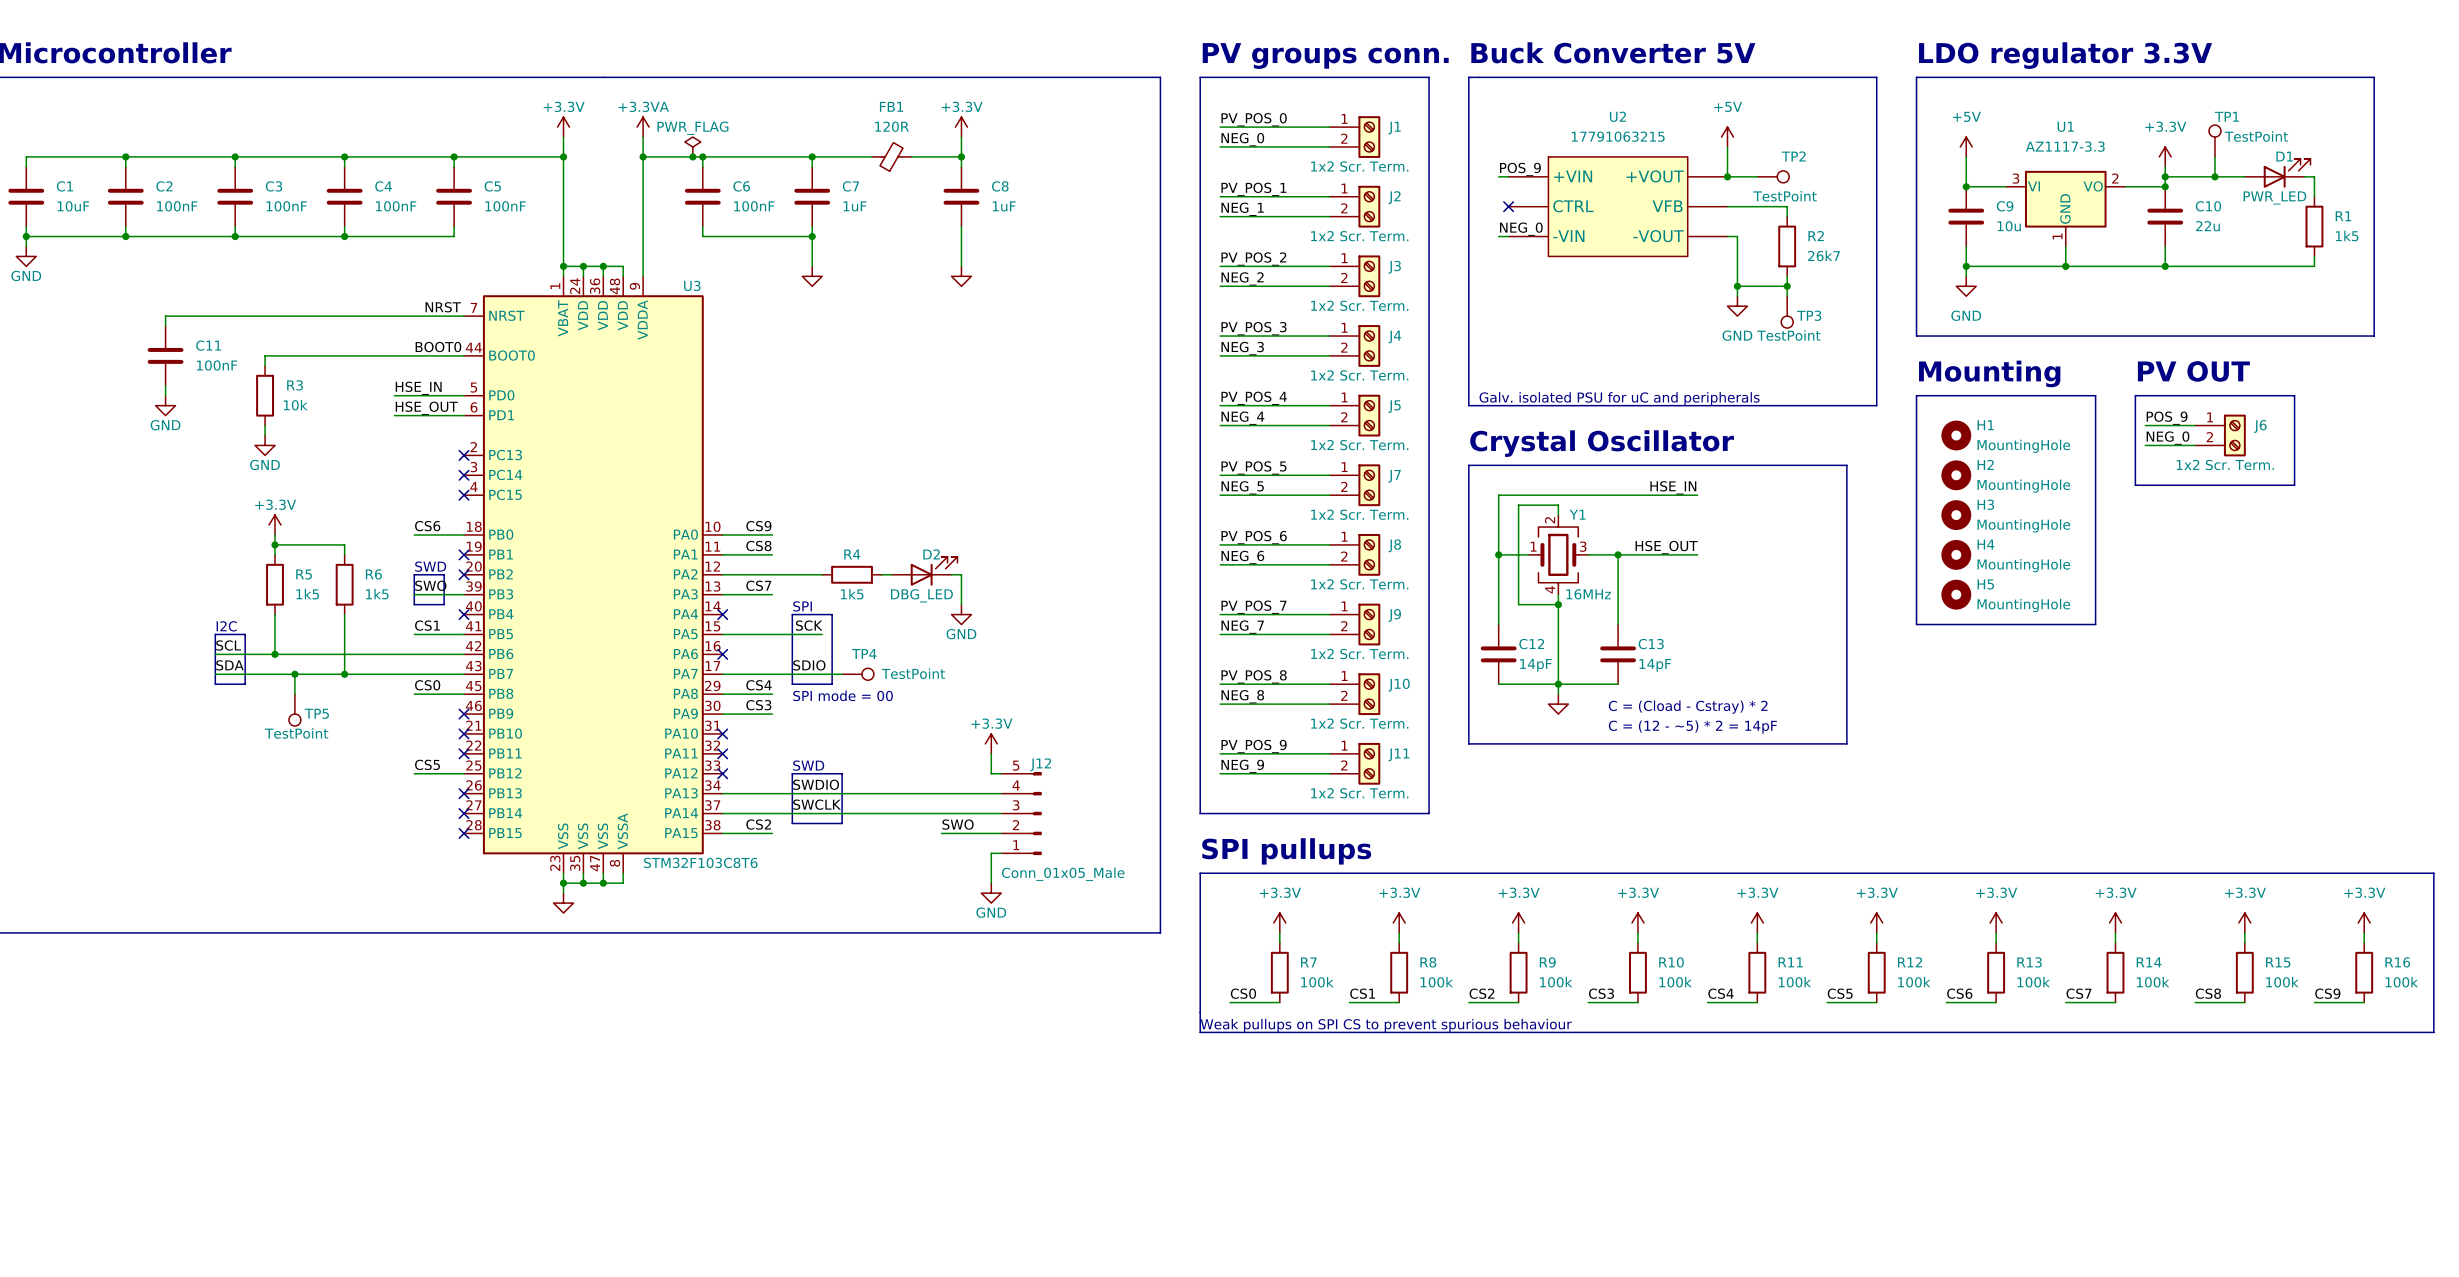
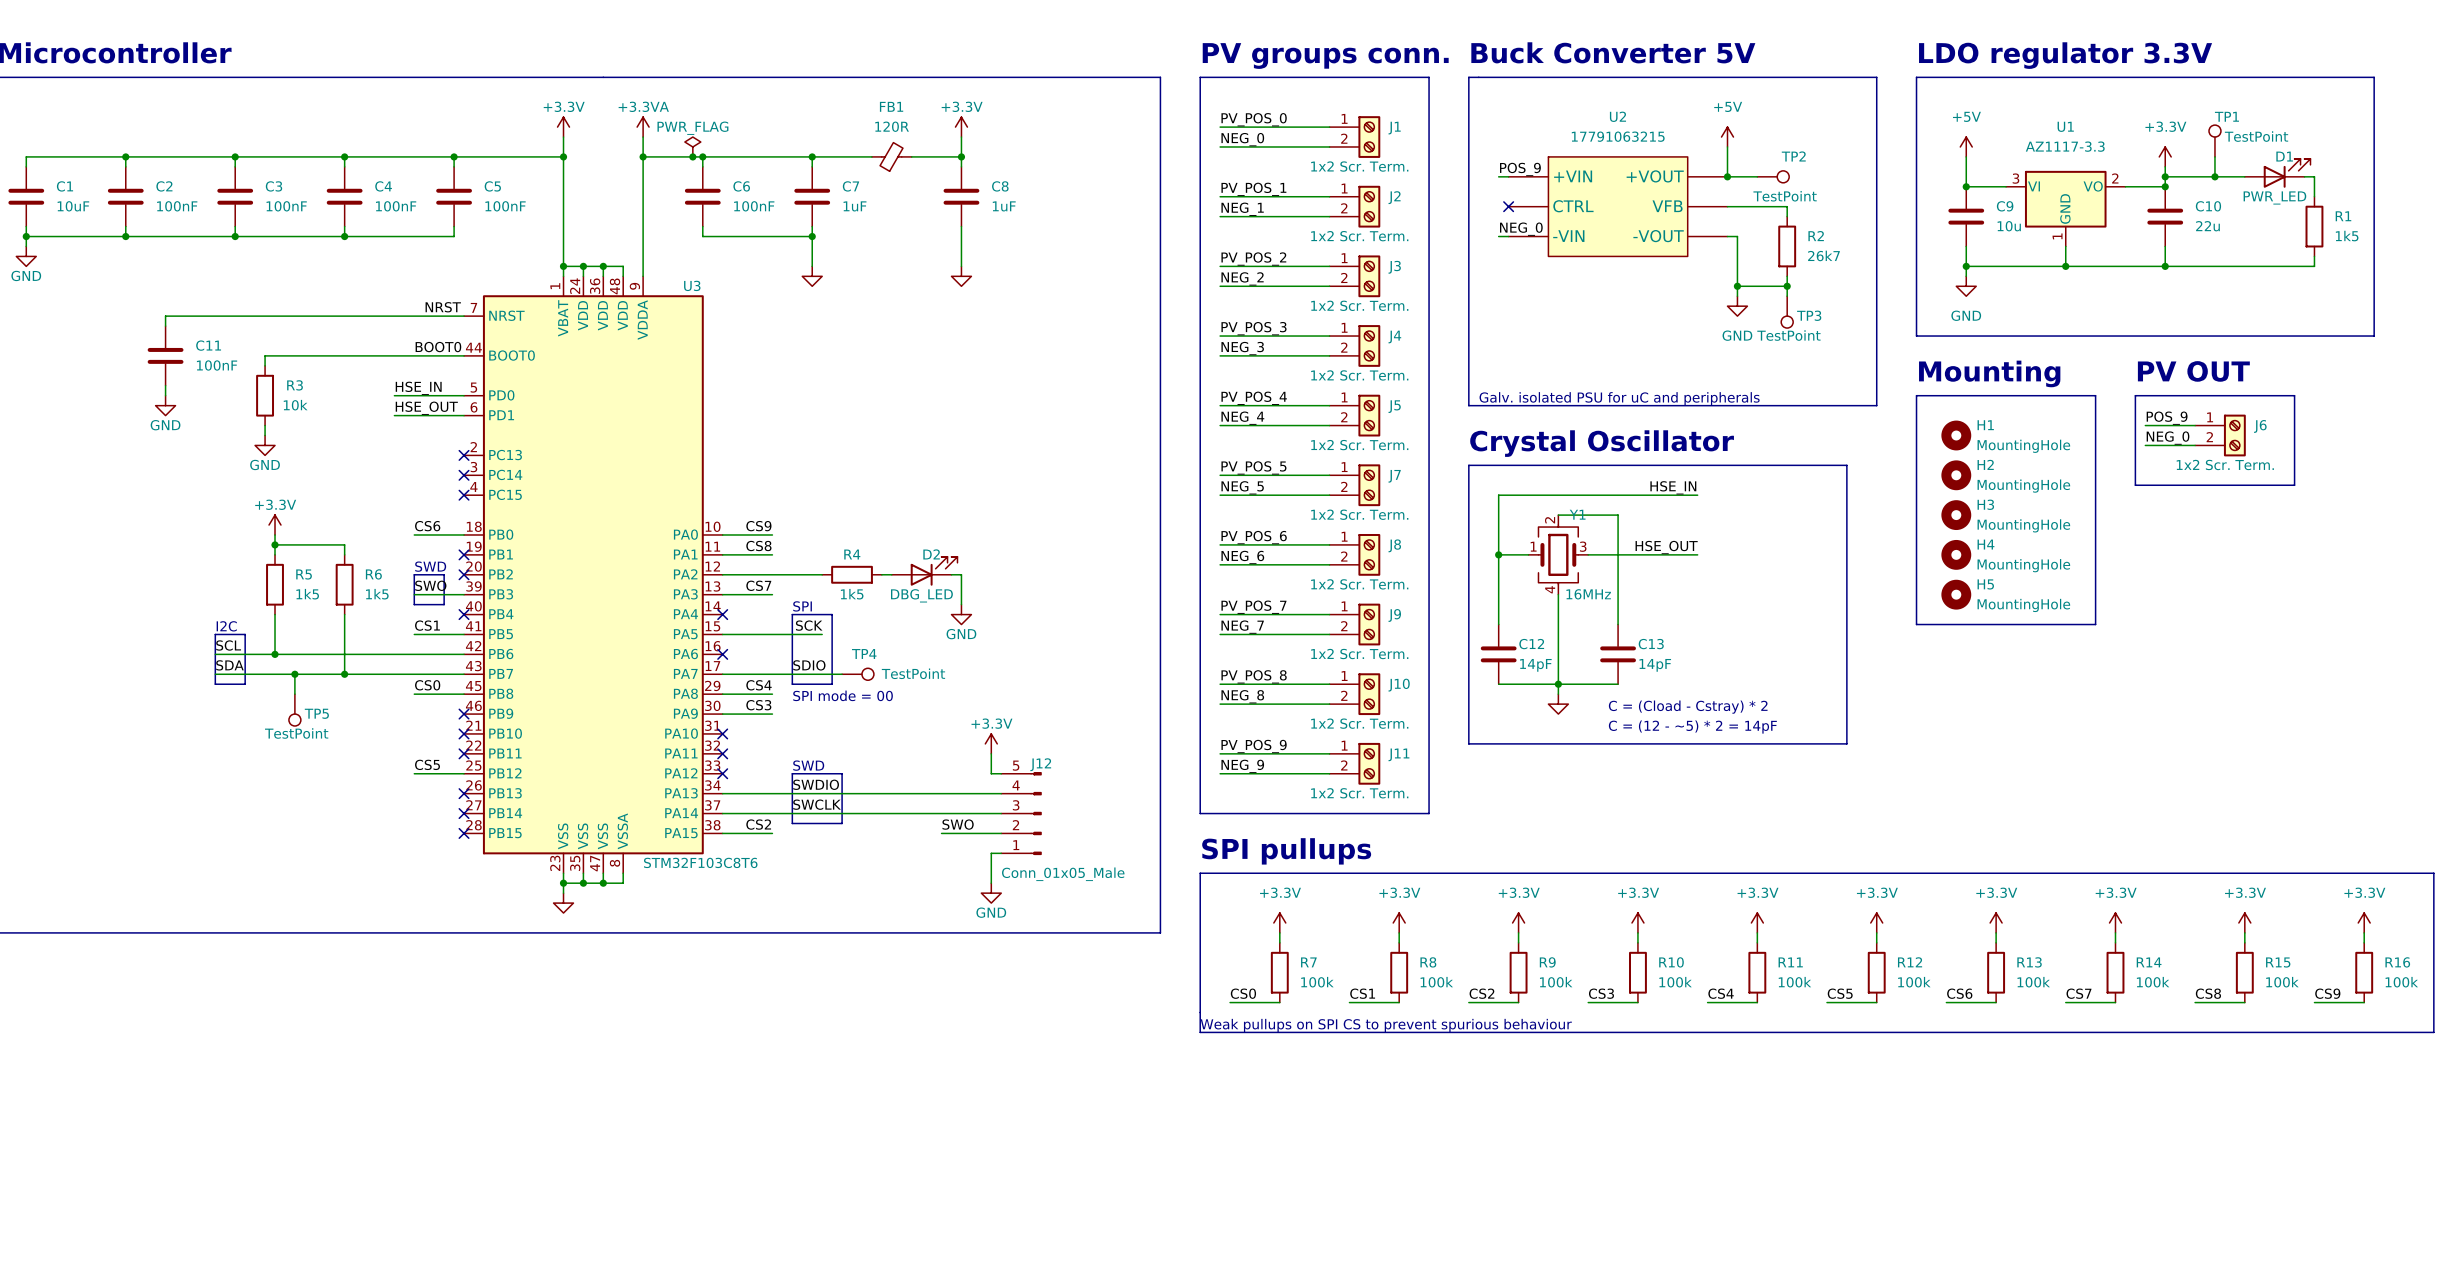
wire: (1558, 515) (1558, 505) (1518, 505) (1518, 604) (1558, 604) -> (1558, 515) (1618, 515) (1618, 554)
junction: (1618, 554) -> none
junction: (1558, 604) -> none

